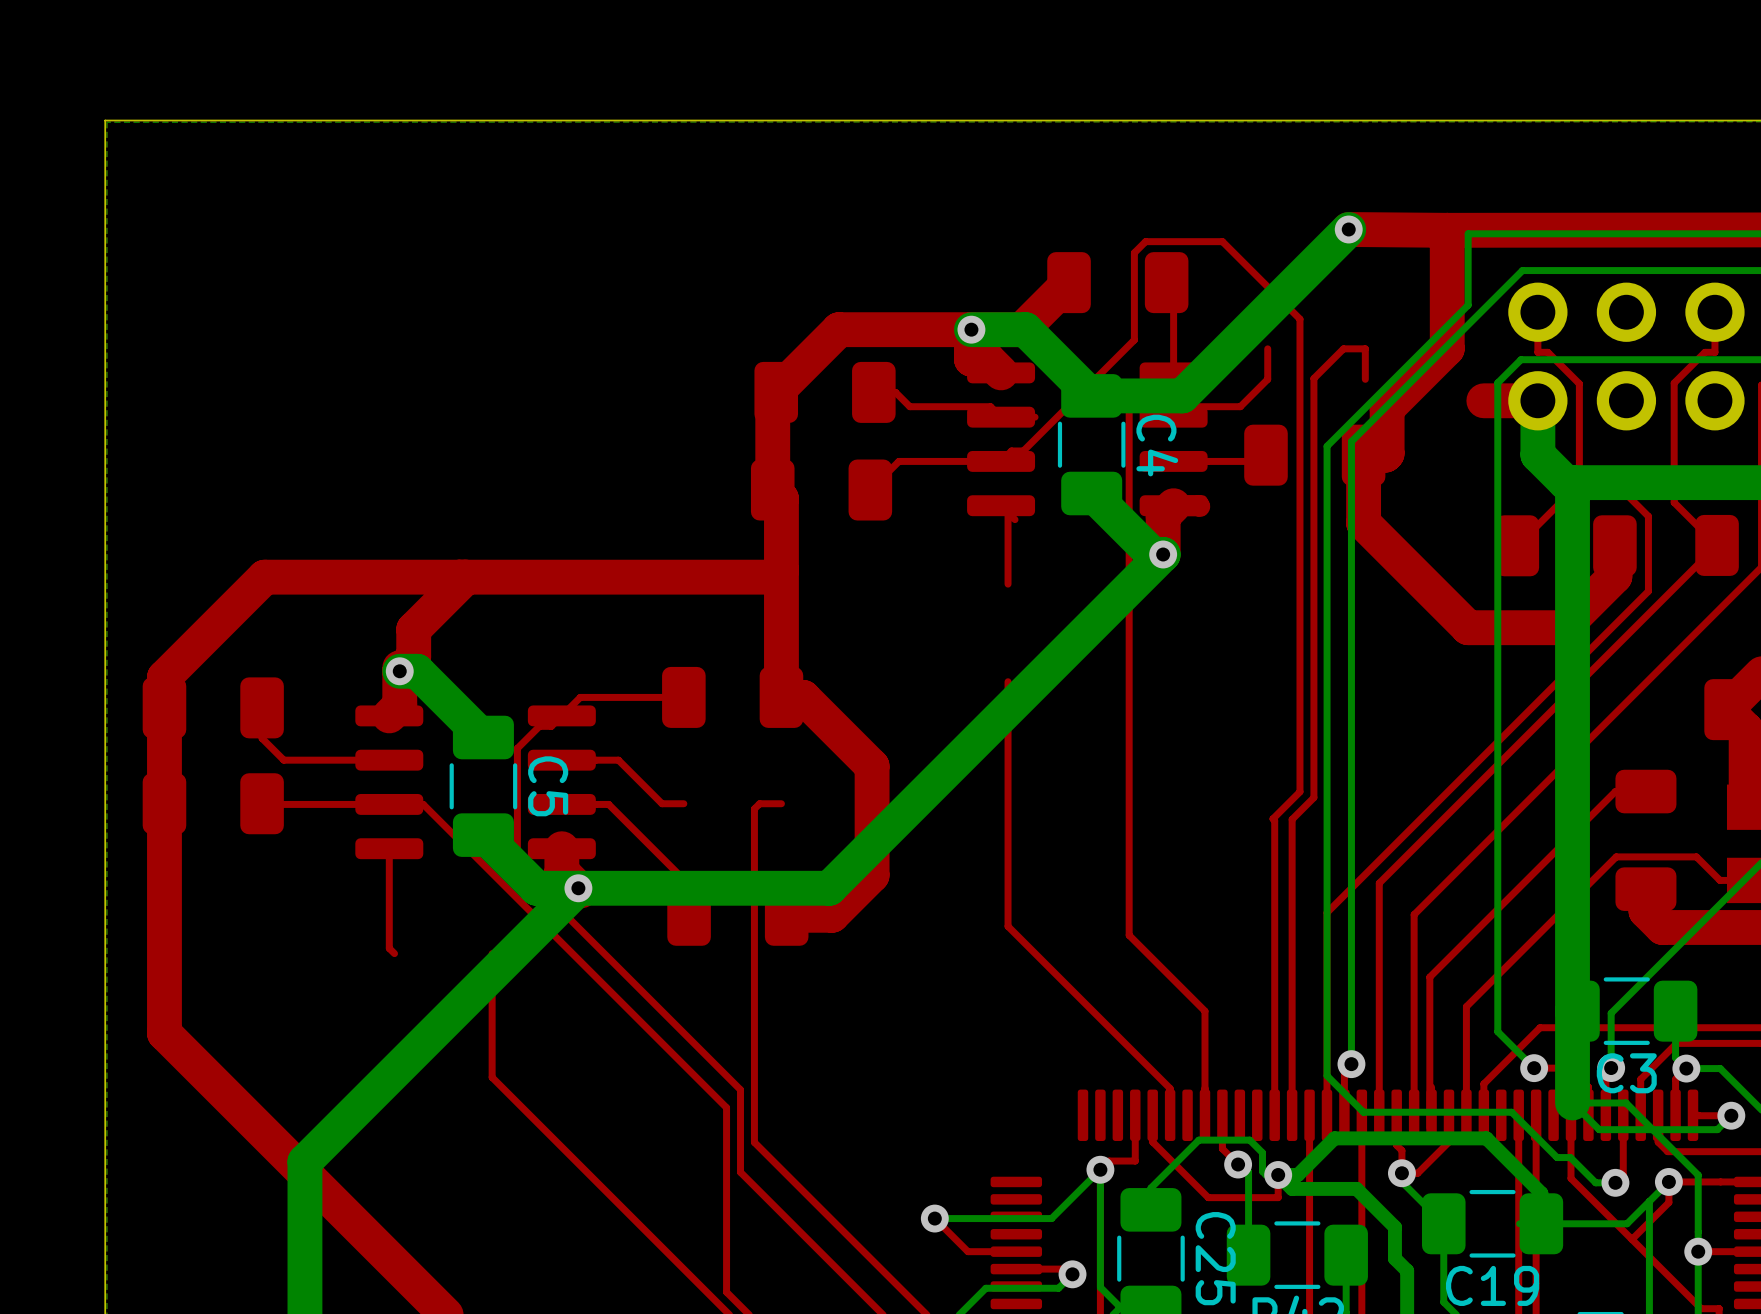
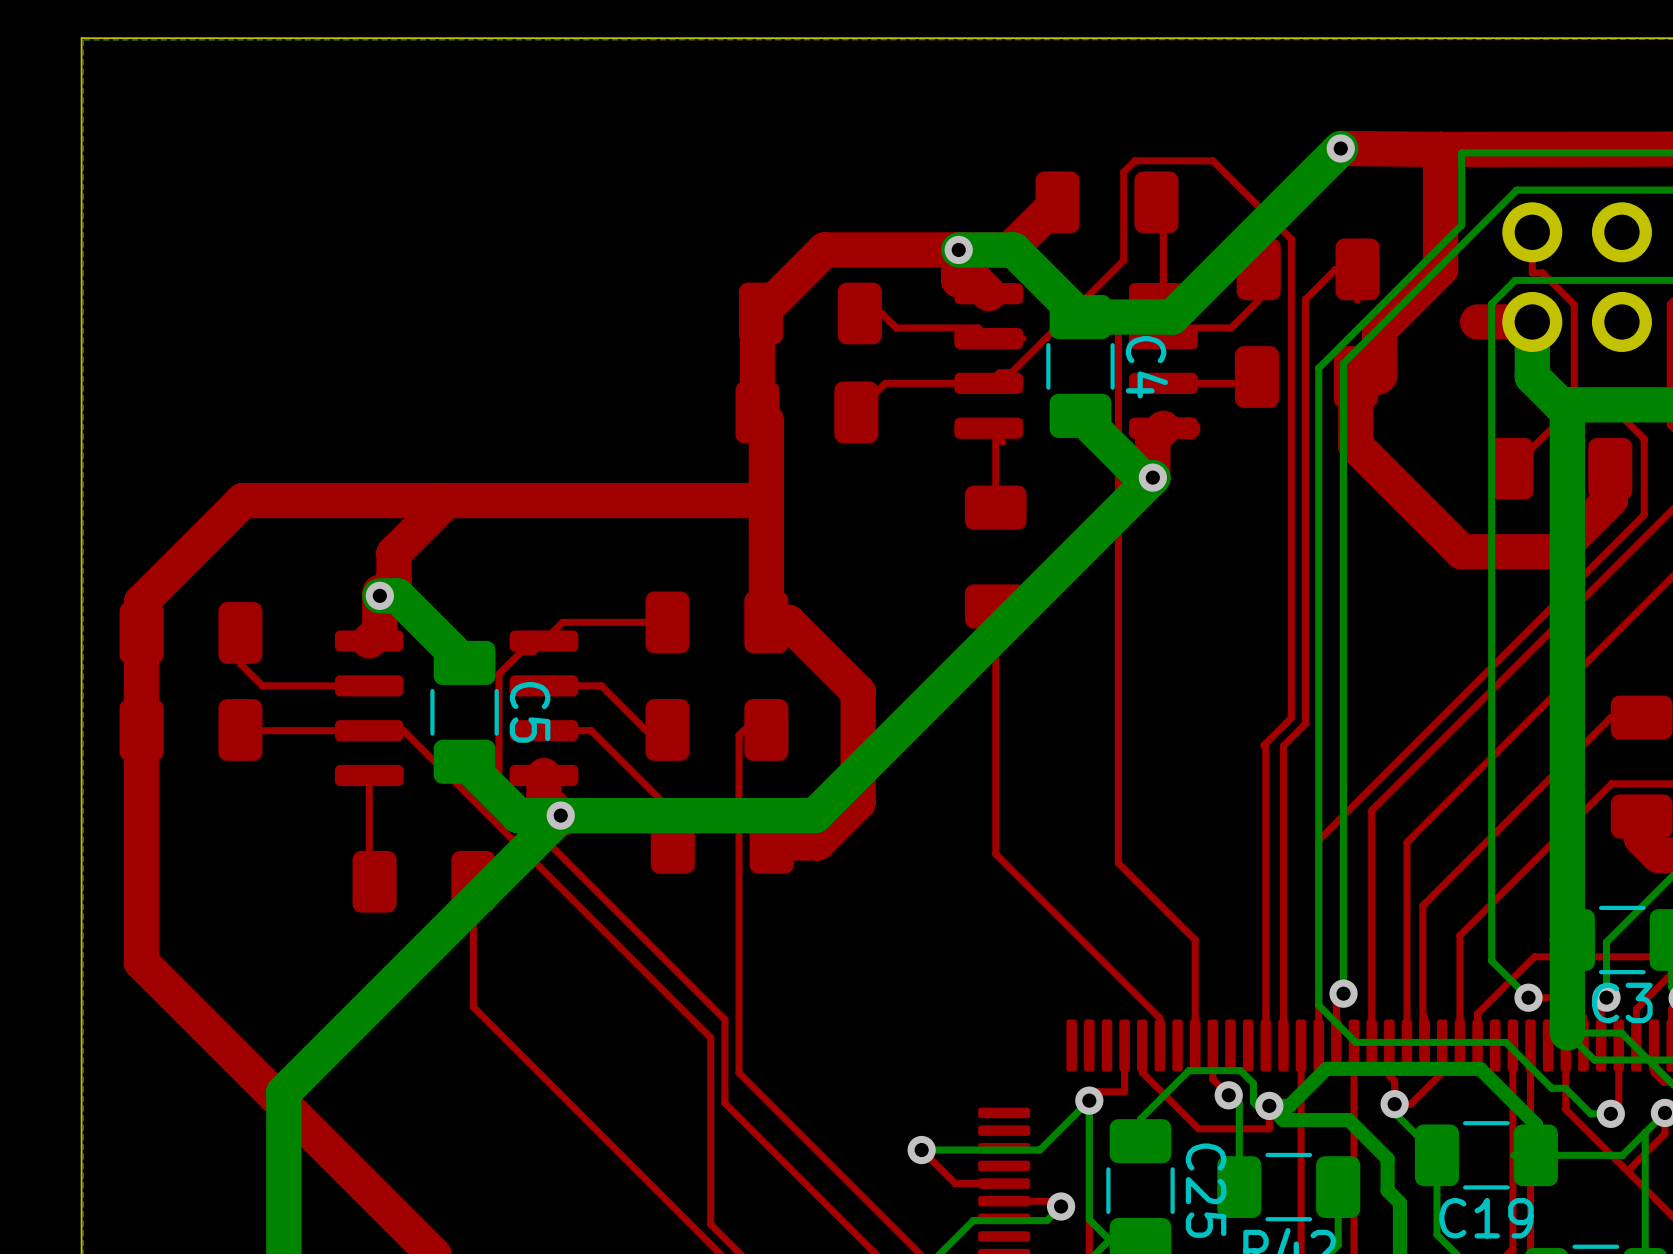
part: none -> (1308, 269)
part: none -> (995, 557)
part: none -> (716, 729)
part: none -> (423, 881)

